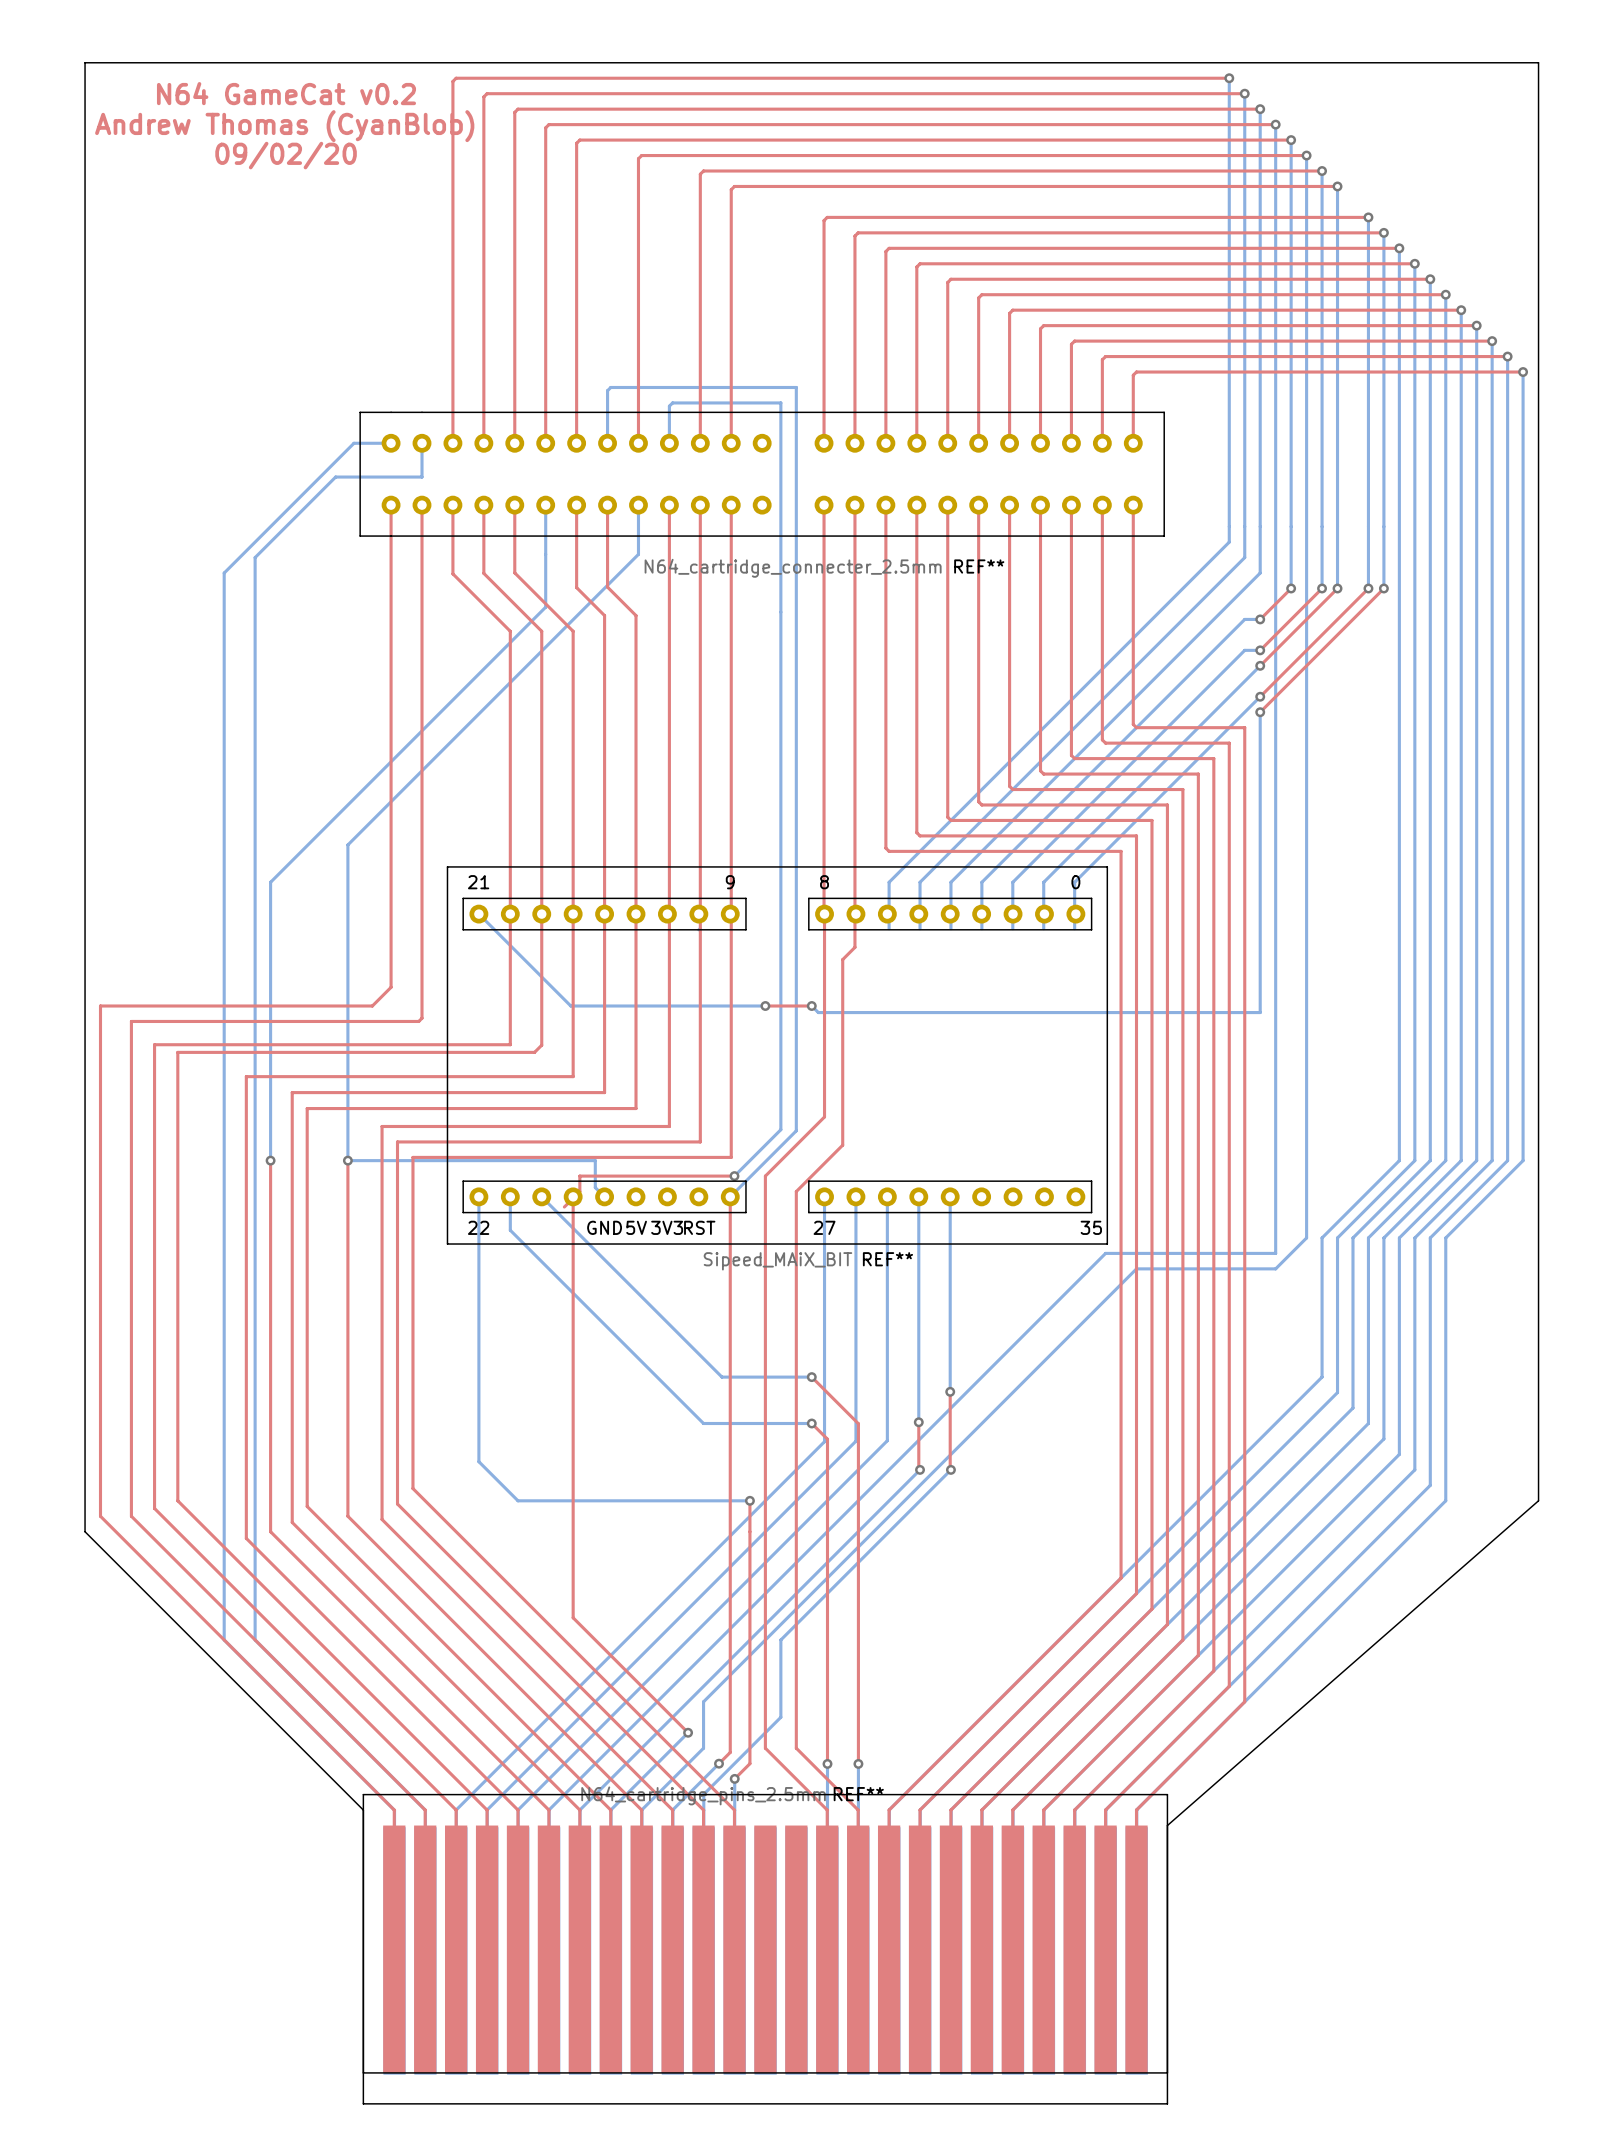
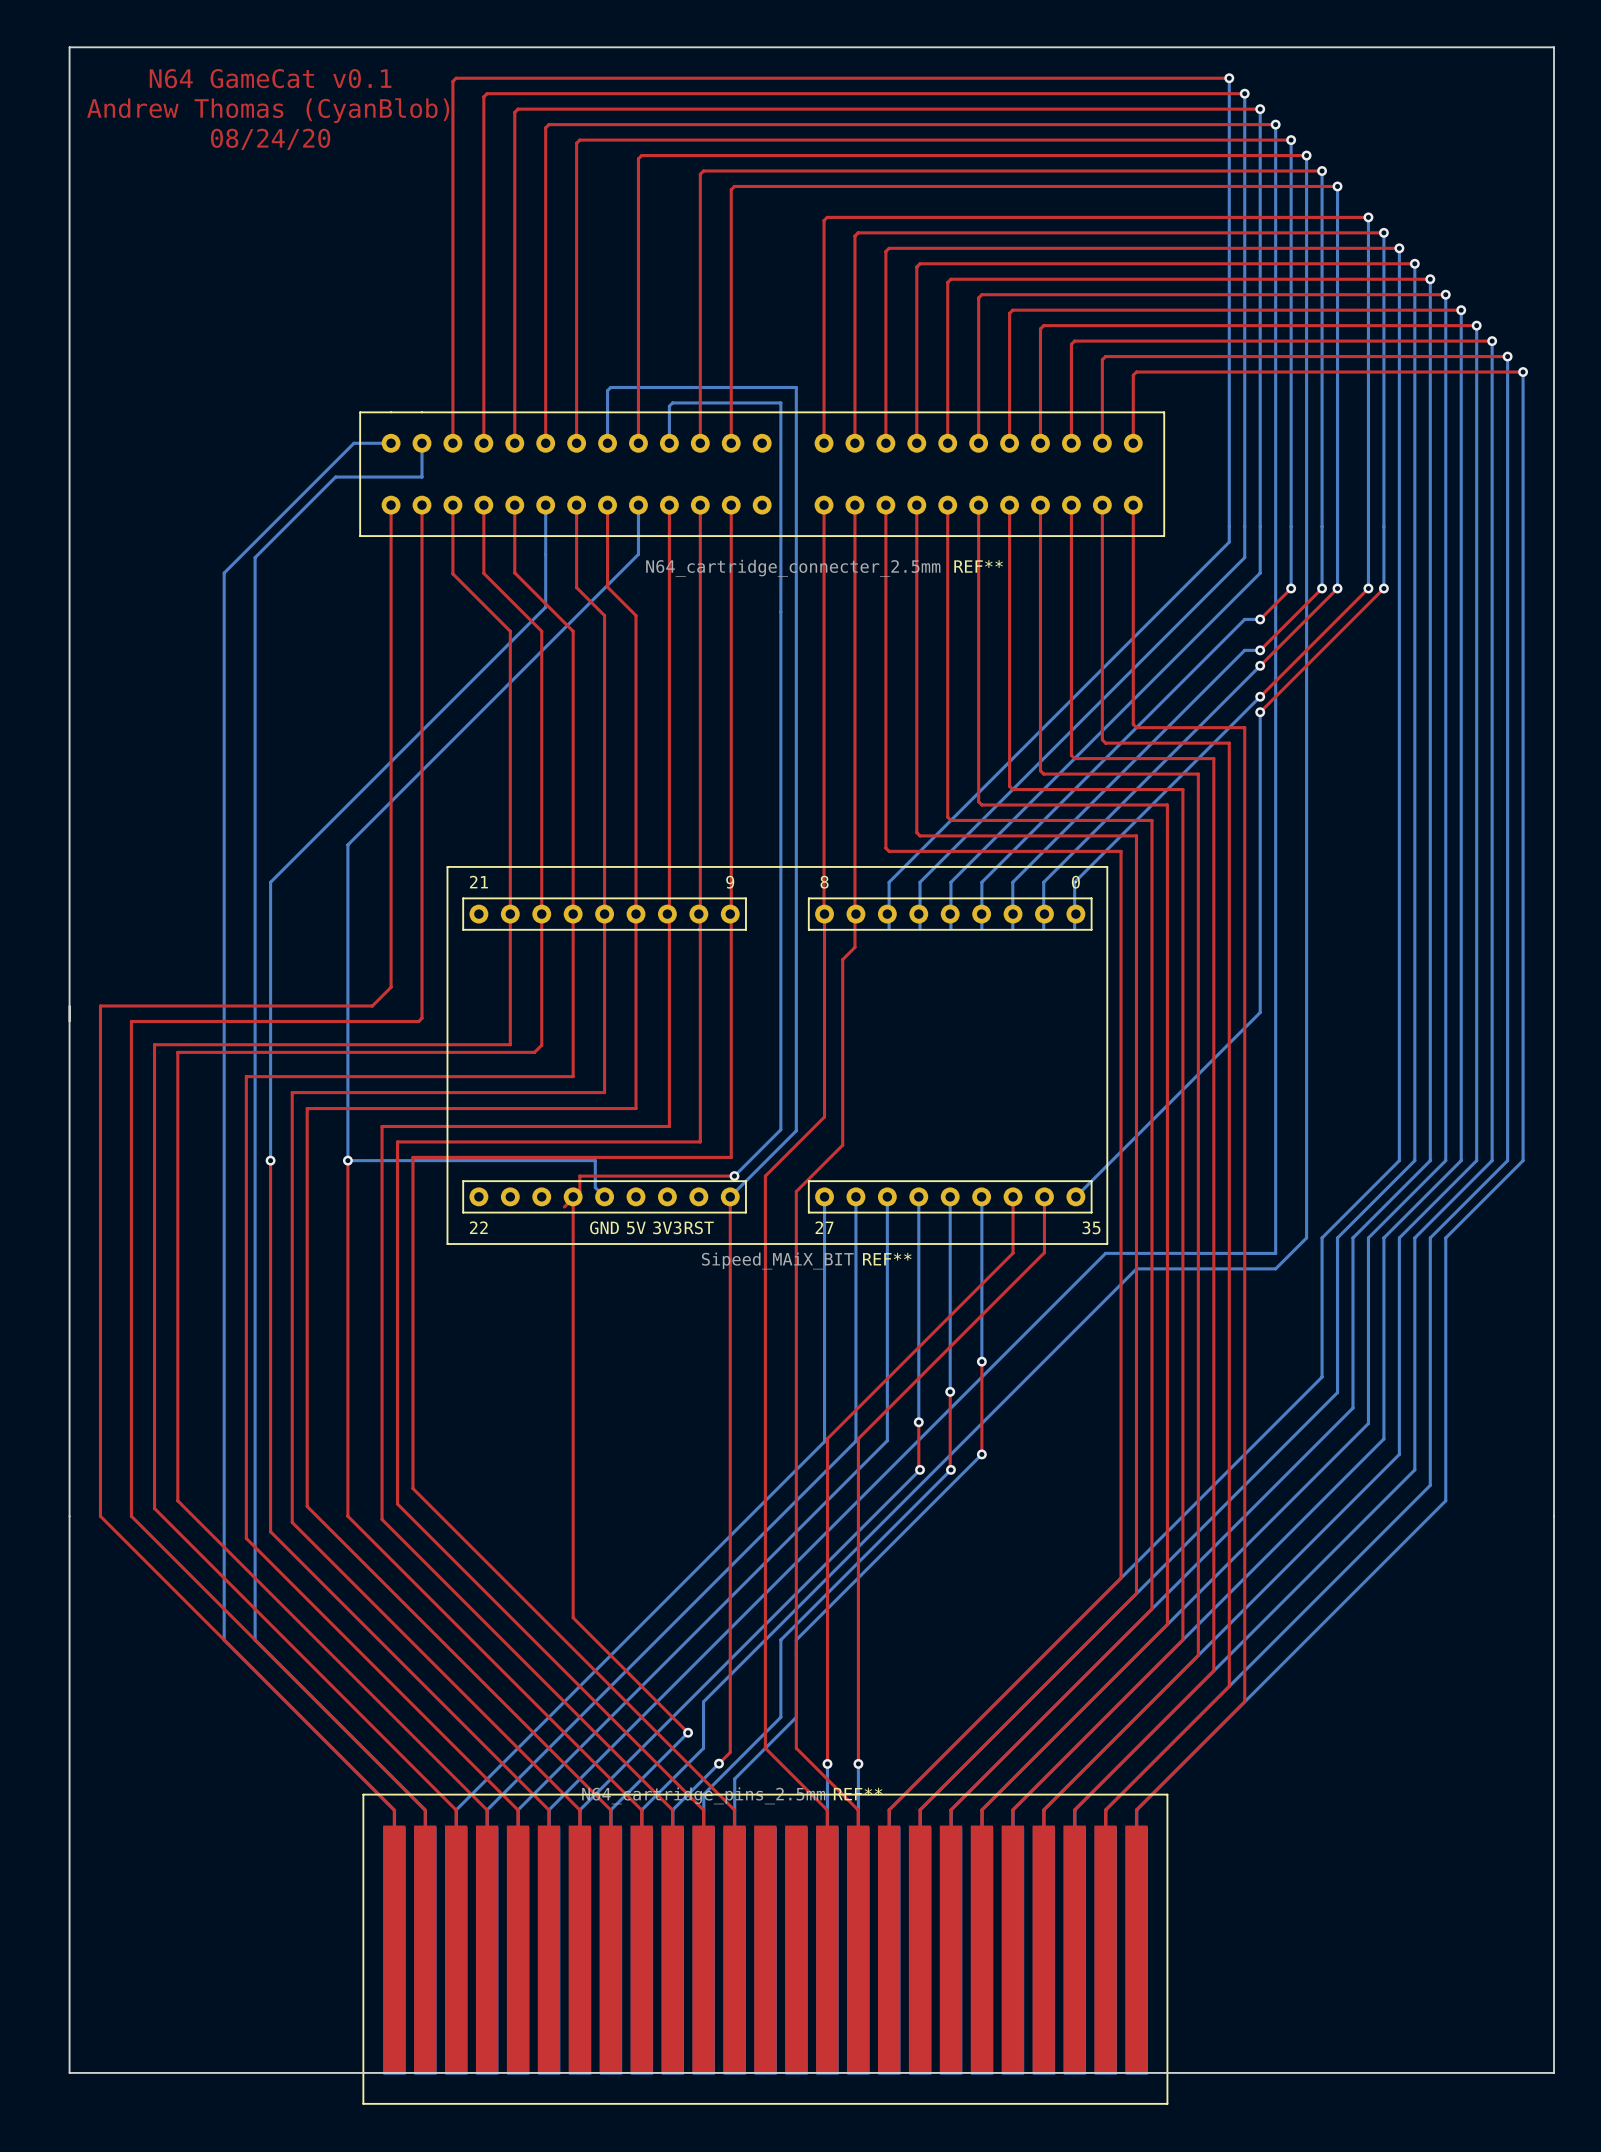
text: N64 GameCat v0.2 (286, 93) -> N64 GameCat v0.1 (270, 78)
text position: Andrew Thomas (CyanBlob) (284, 126) -> Andrew Thomas (CyanBlob) (268, 110)
text: 09/02/20 (286, 155) -> 08/24/20 (270, 139)
bottom track: (478, 914) (570, 1006) (765, 1006) -> none
top track: (765, 1006) (811, 1006) -> none
via: (765, 1006) -> none
bottom track: (811, 1006) (818, 1012) (1260, 1012) -> (1075, 1196) (1260, 1012)
via: (811, 1006) -> none
bottom track: (478, 1196) (478, 1461) (517, 1500) (749, 1500) -> none
bottom track: (510, 1196) (510, 1230) (703, 1423) (811, 1423) -> none
bottom track: (541, 1196) (721, 1377) (811, 1377) -> none
bottom track: none -> (981, 1197) (981, 1361)
top track: none -> (981, 1361) (981, 1454)
via: none -> (981, 1361)
top track: (811, 1377) (858, 1423) (858, 1438) -> (1044, 1196) (1044, 1252) (858, 1438)
via: (811, 1377) -> none
top track: (811, 1423) (827, 1439) -> (1013, 1196) (1013, 1253) (827, 1439)
via: (811, 1423) -> none
bottom track: none -> (981, 1454) (796, 1639) (796, 1717) (734, 1778)
via: none -> (981, 1454)
top track: (749, 1500) (749, 1763) (734, 1778) -> none
via: (749, 1500) -> none
via: (734, 1778) -> none
board edge: (363, 2072) (363, 1810) (85, 1531) (85, 62) (1538, 62) (1538, 1500) (1167, 1825) (1167, 2072) -> (363, 2072) (69, 2072) (69, 47) (1554, 47) (1554, 2072) (1167, 2072)

